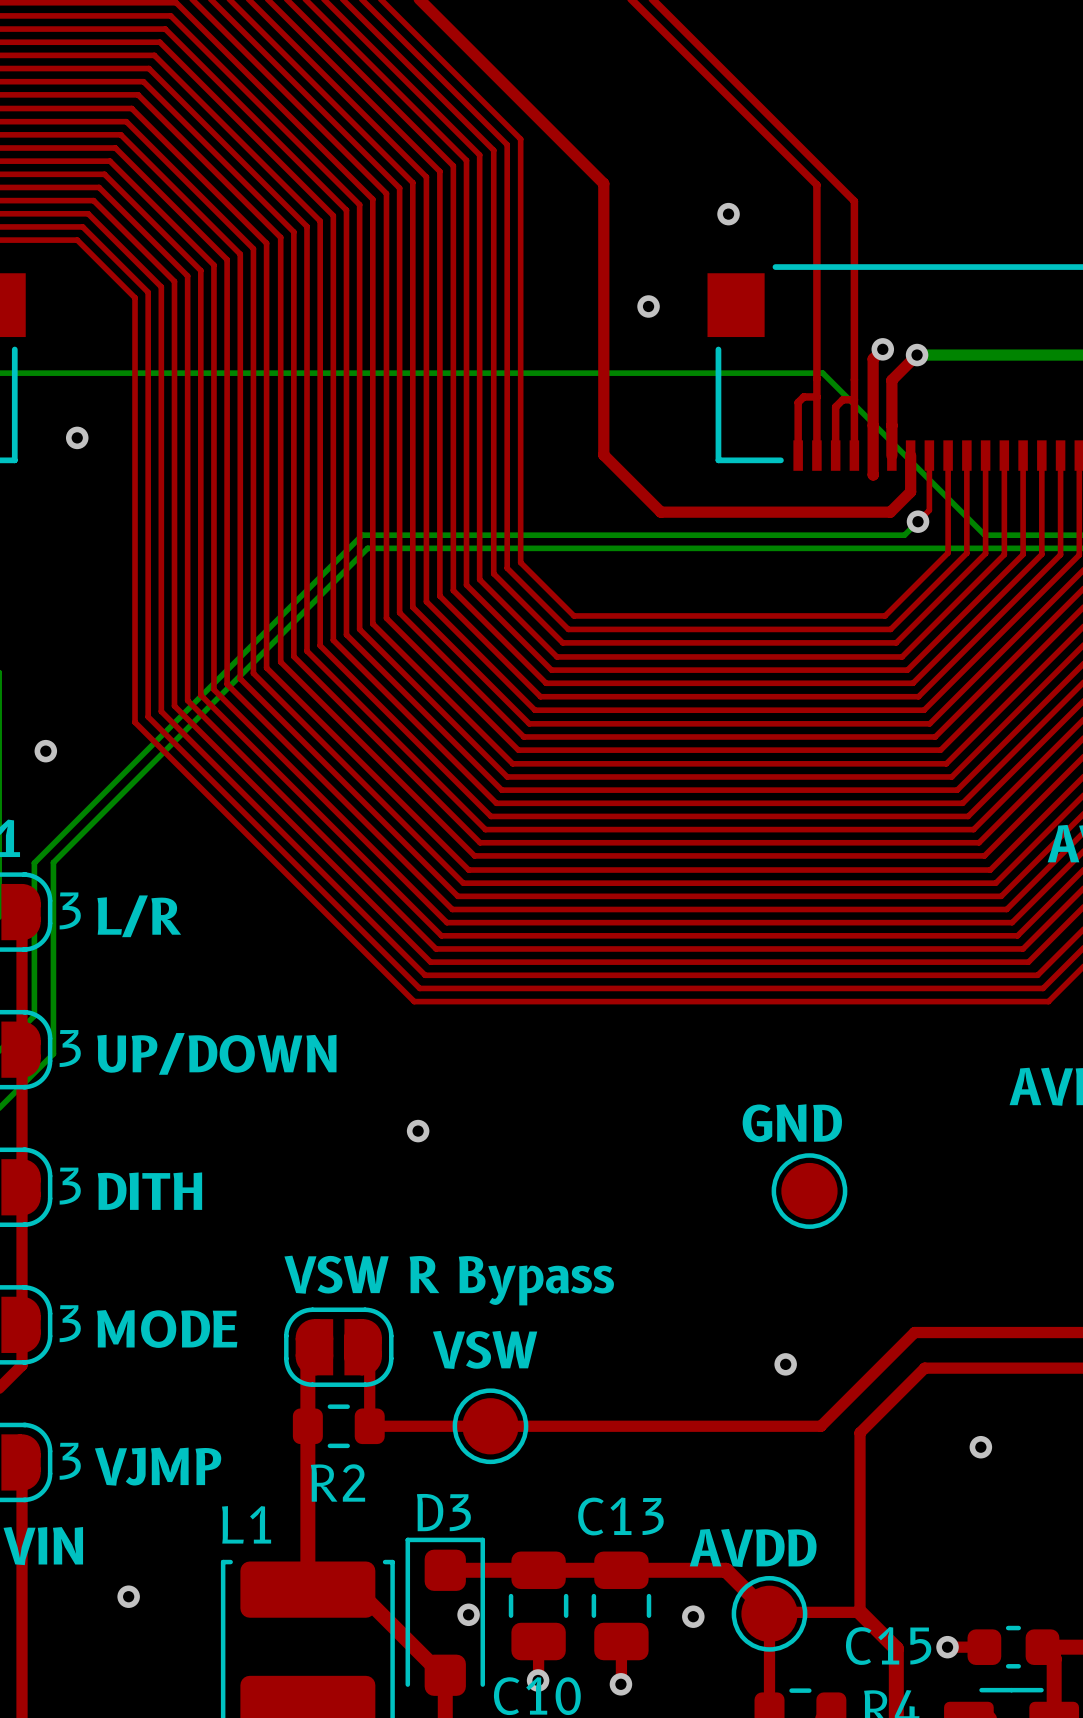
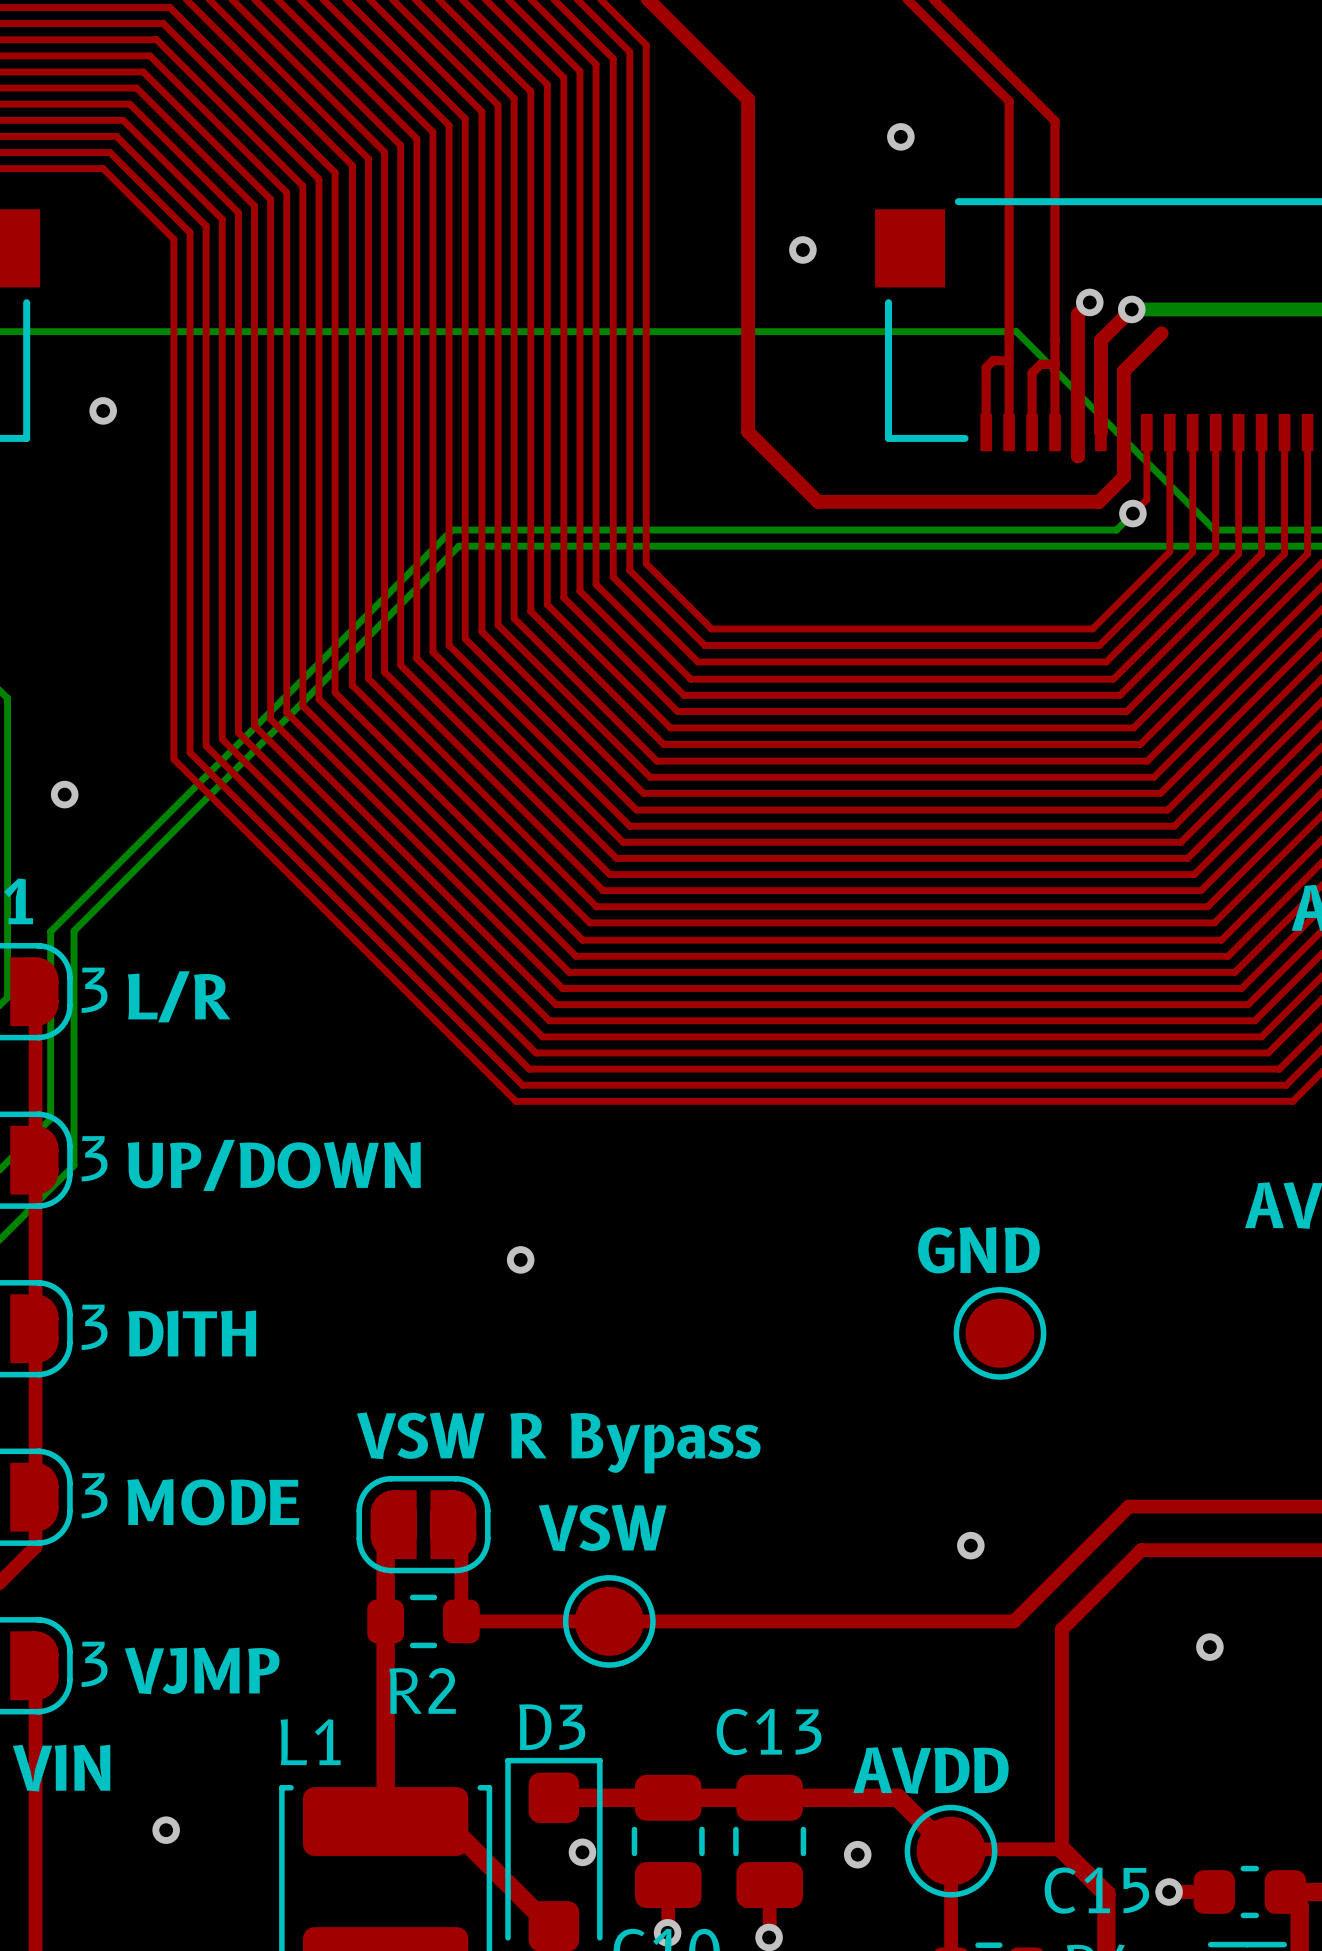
top track: none -> (1161, 333) (1123, 370) (1123, 432)

